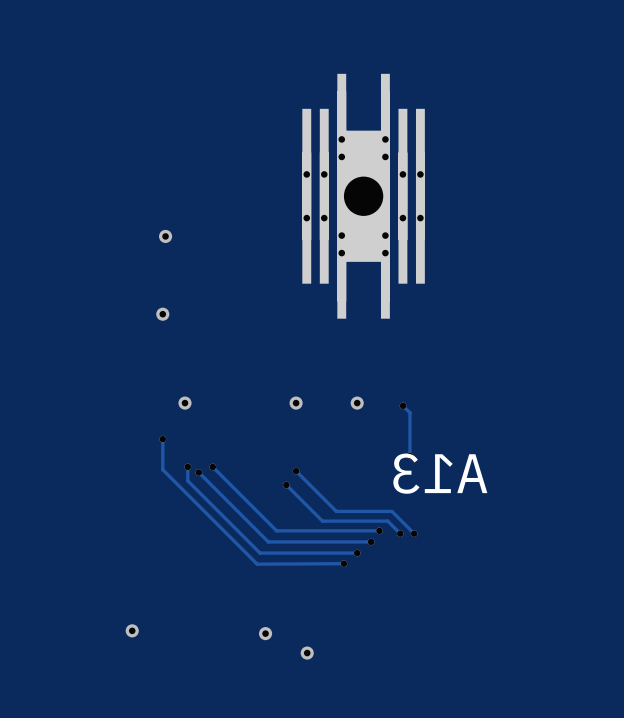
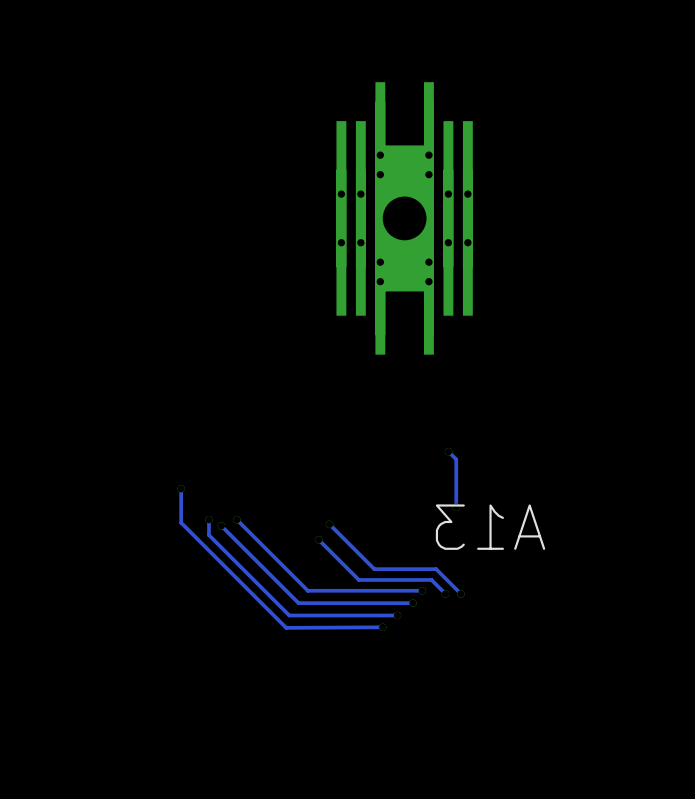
via: (165, 236) -> none
via: (162, 314) -> none
via: (185, 403) -> none
via: (296, 403) -> none
via: (357, 403) -> none
via: (132, 630) -> none
via: (265, 633) -> none
via: (307, 653) -> none

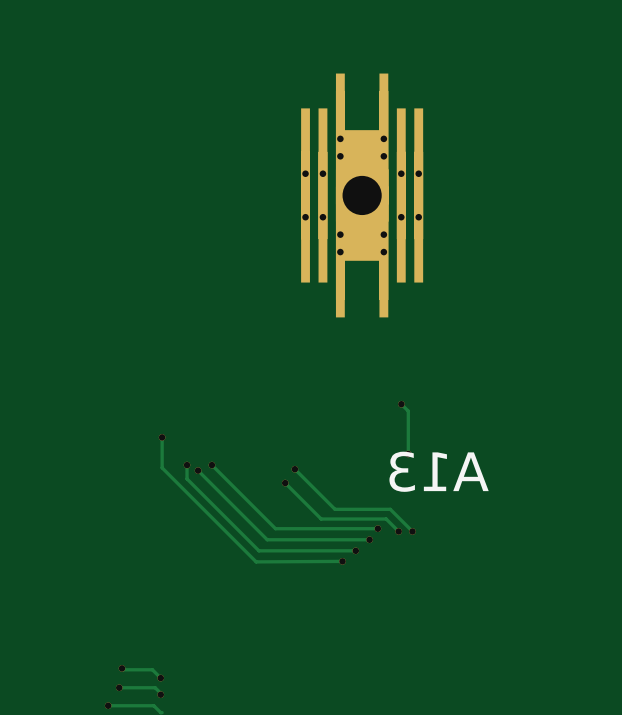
track: none -> (122, 668) (152, 669) (160, 678)
via: none -> (122, 668)
via: none -> (160, 678)
track: none -> (119, 687) (155, 687) (160, 694)
via: none -> (119, 687)
via: none -> (160, 694)
track: none -> (108, 705) (153, 705) (162, 712)
via: none -> (108, 705)

